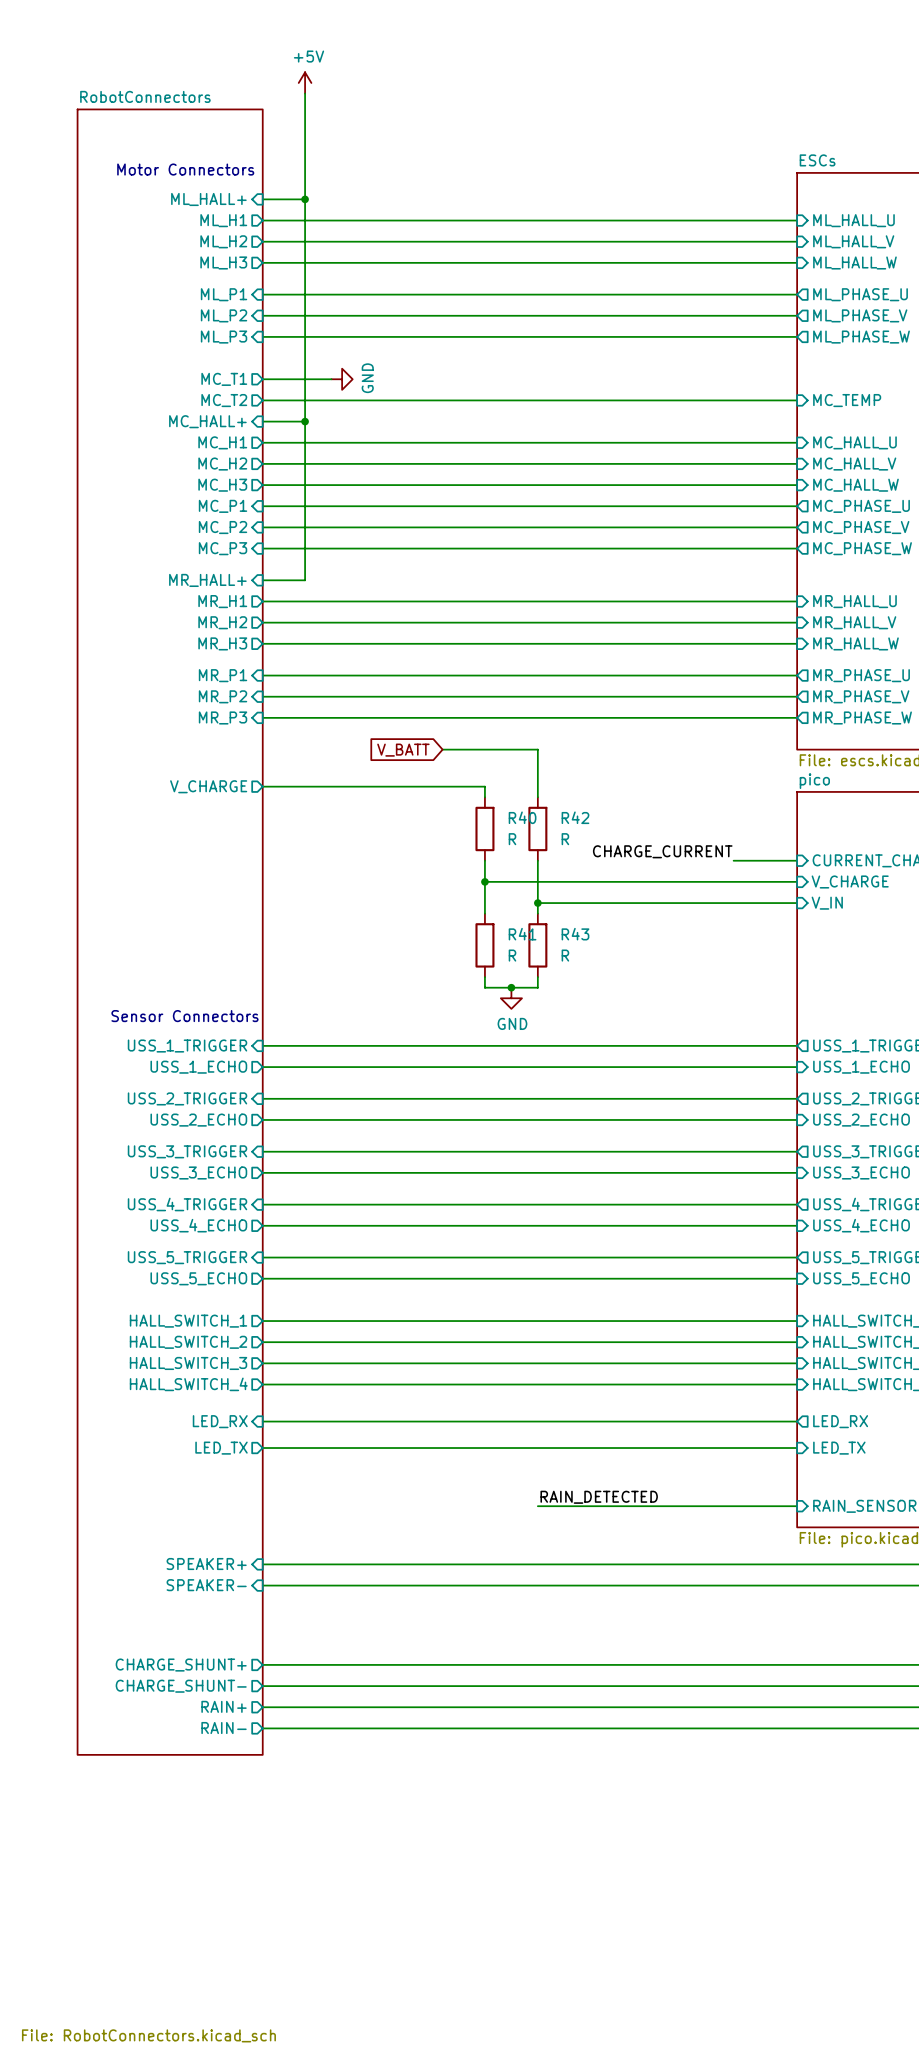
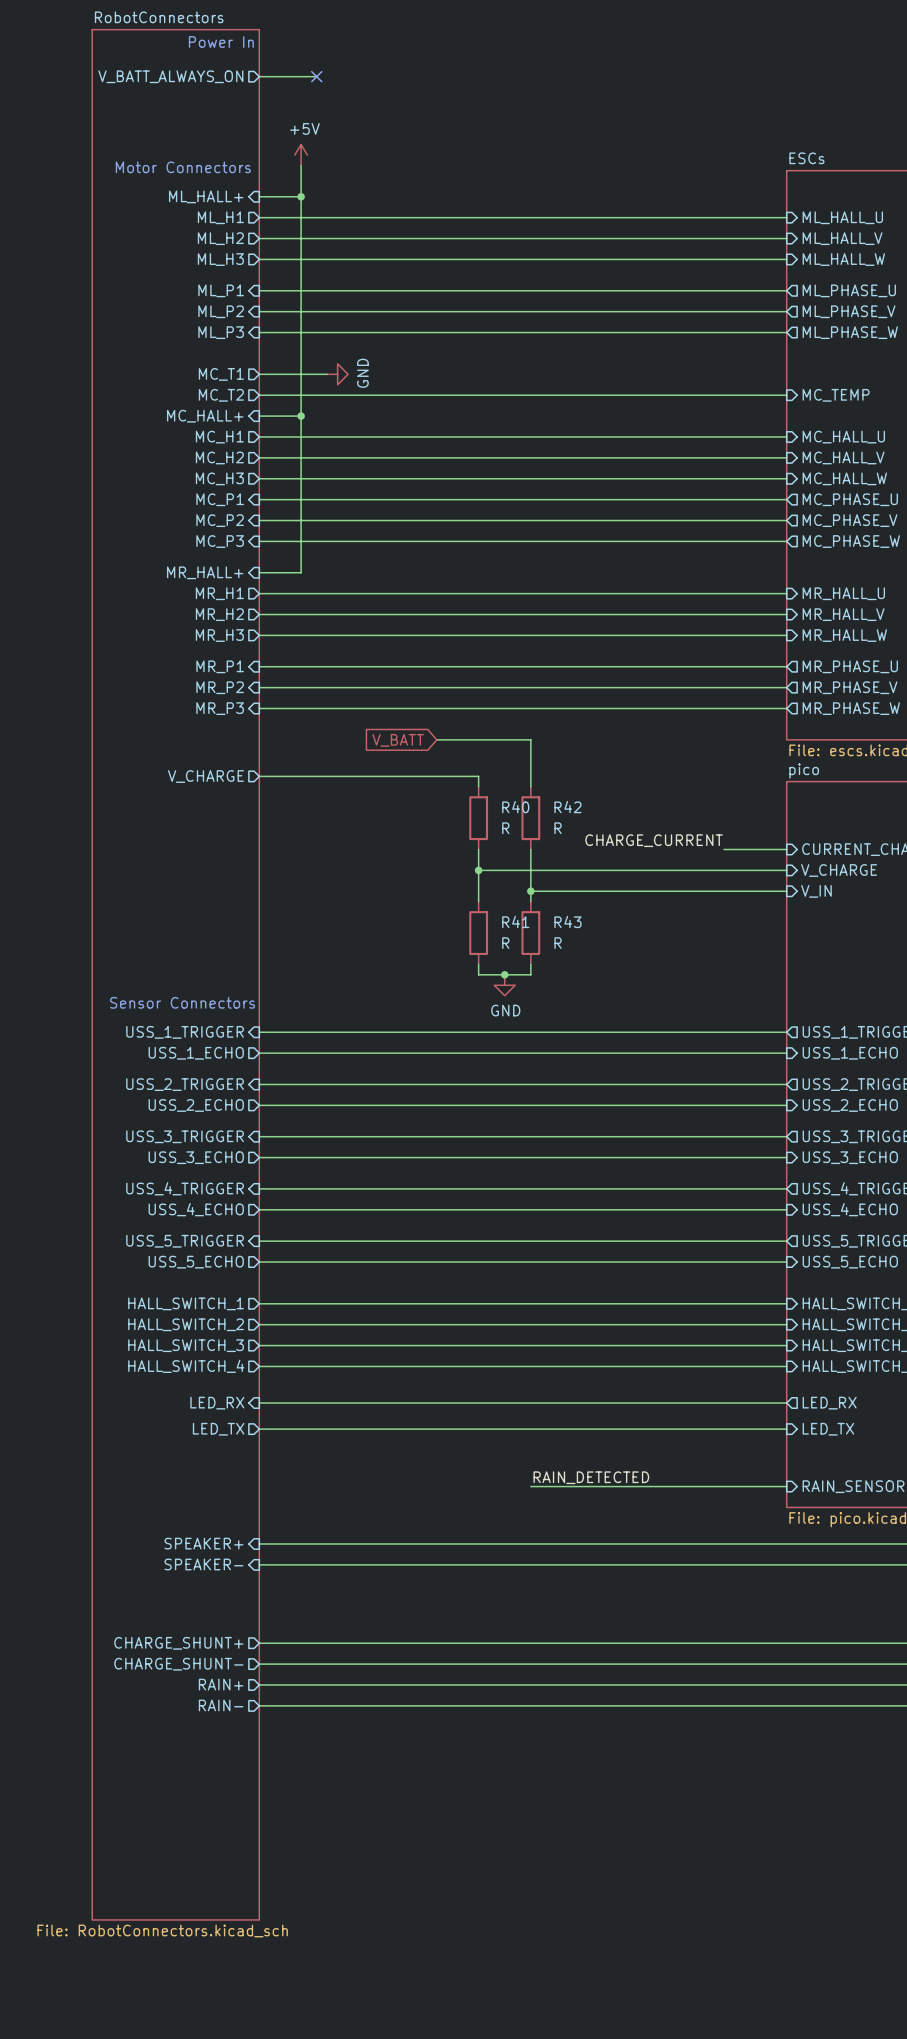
text: none -> Power In (221, 42)
sheet pin: none -> V_BATT_ALWAYS_ON (170, 76)
wire: none -> (259, 76) (316, 76)
no-connect mark: none -> (316, 76)
power symbol position: +5V (305, 82) -> +5V (301, 155)
wire: (305, 93) (305, 167) -> none
sheet RobotConnectors: File: RobotConnectors.kicad_sch (170, 932) -> none
sheet RobotConnectors: none -> File: RobotConnectors.kicad_sch (175, 974)

